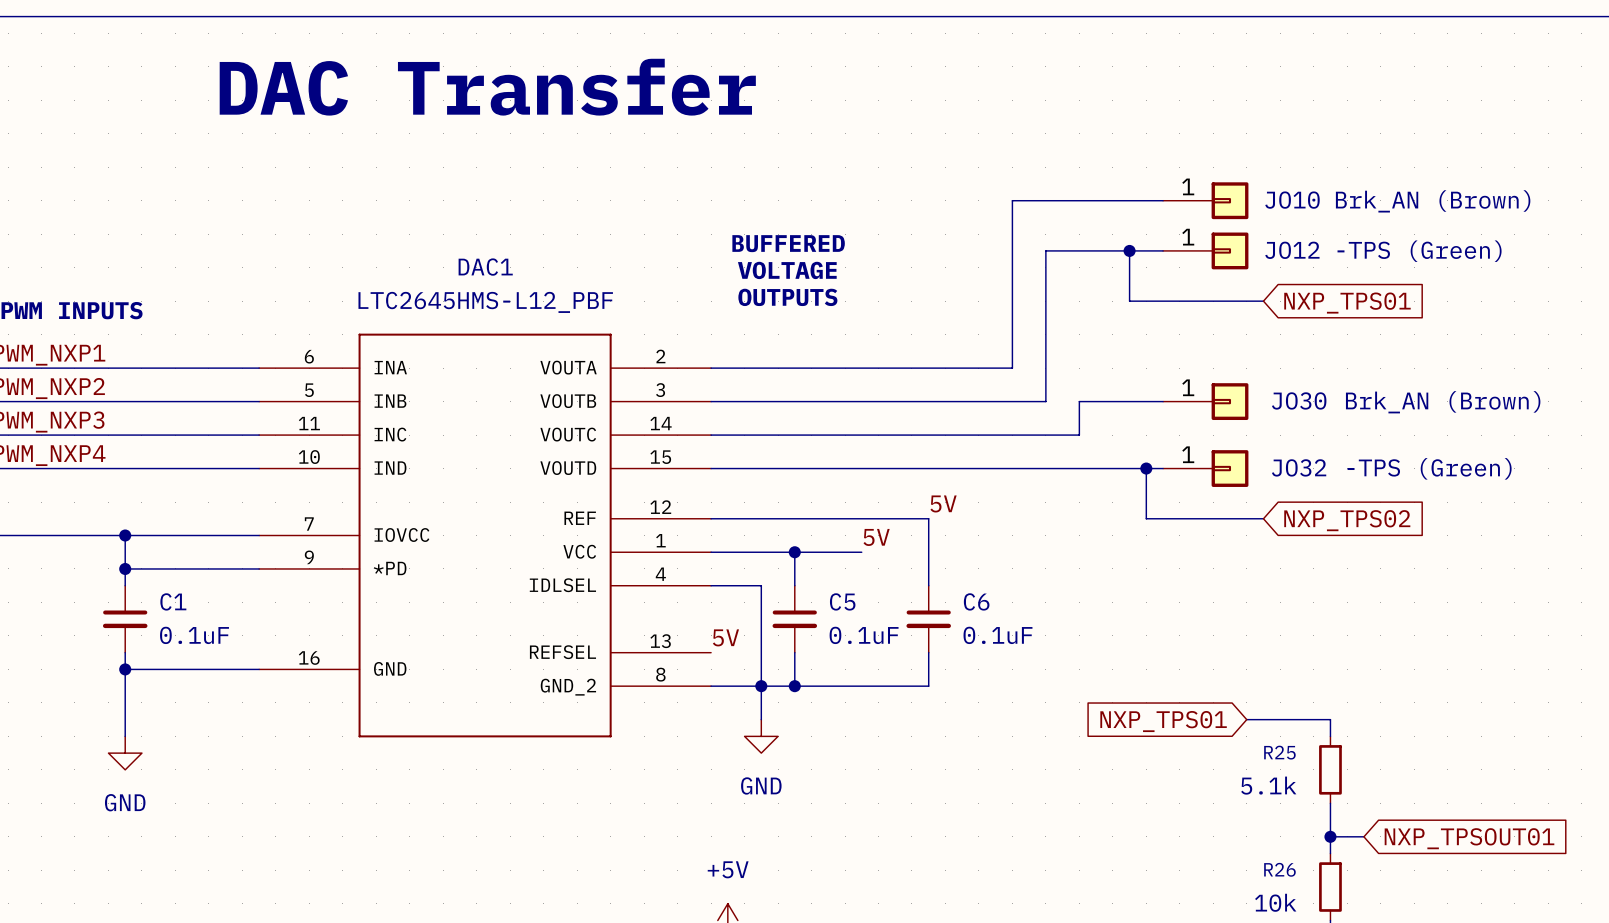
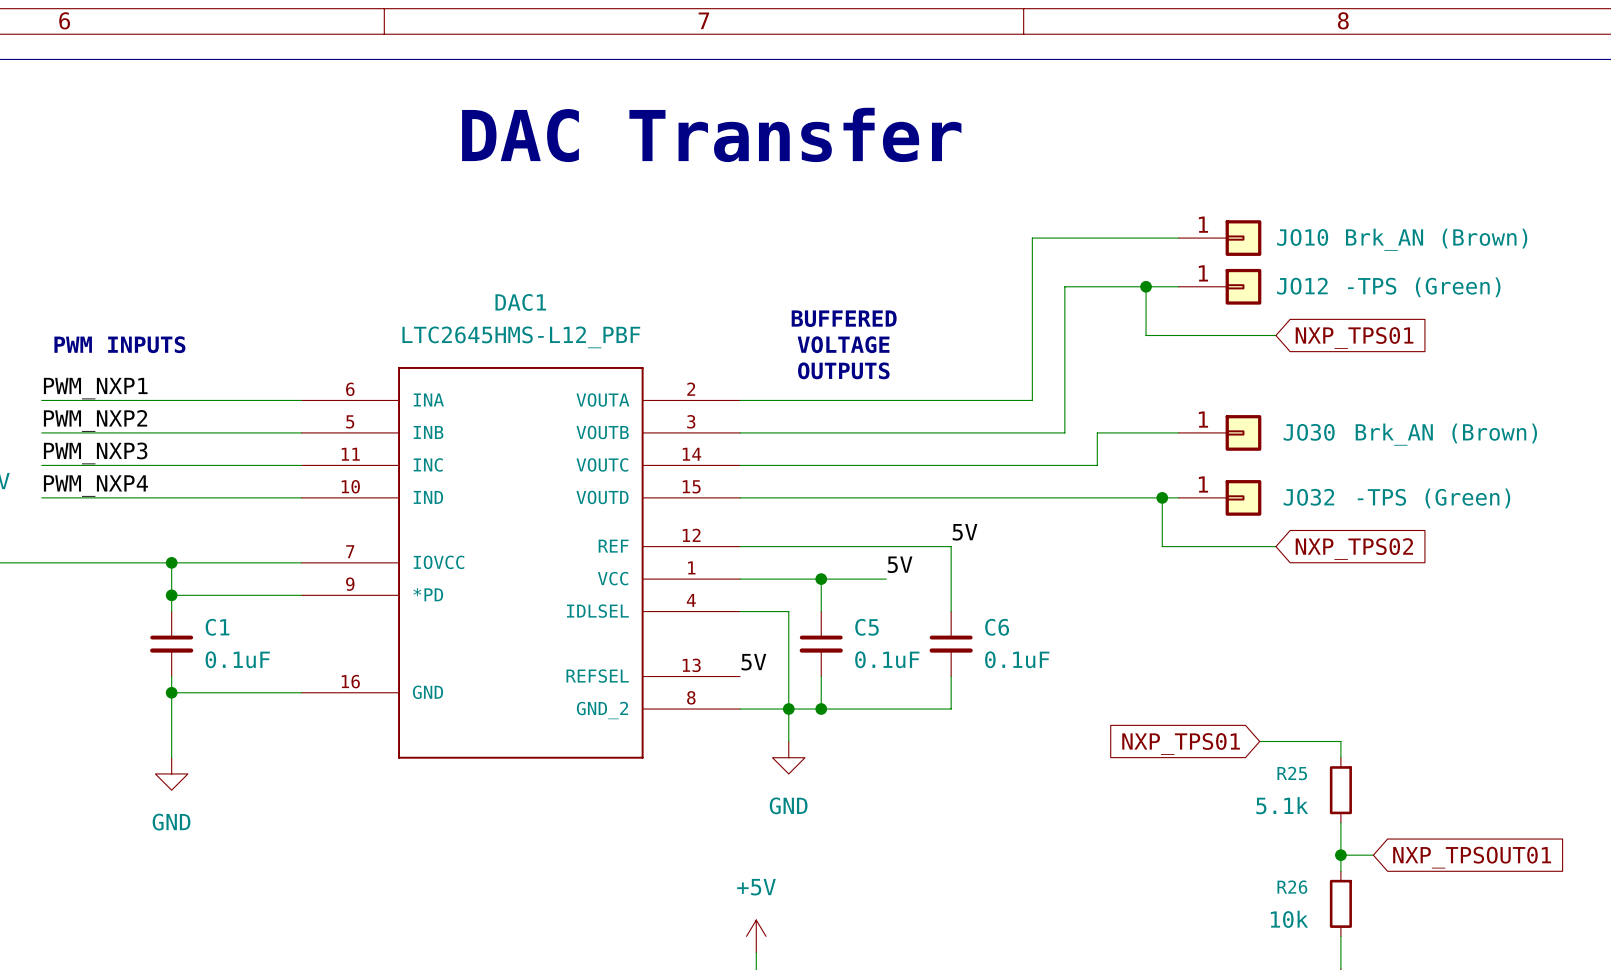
text position: DAC Transfer (487, 87) -> DAC Transfer (711, 134)
text position: BUFFERED (788, 243) -> BUFFERED (844, 318)
text position: VOLTAGE (787, 270) -> VOLTAGE (843, 344)
text position: OUTPUTS (787, 297) -> OUTPUTS (843, 370)

